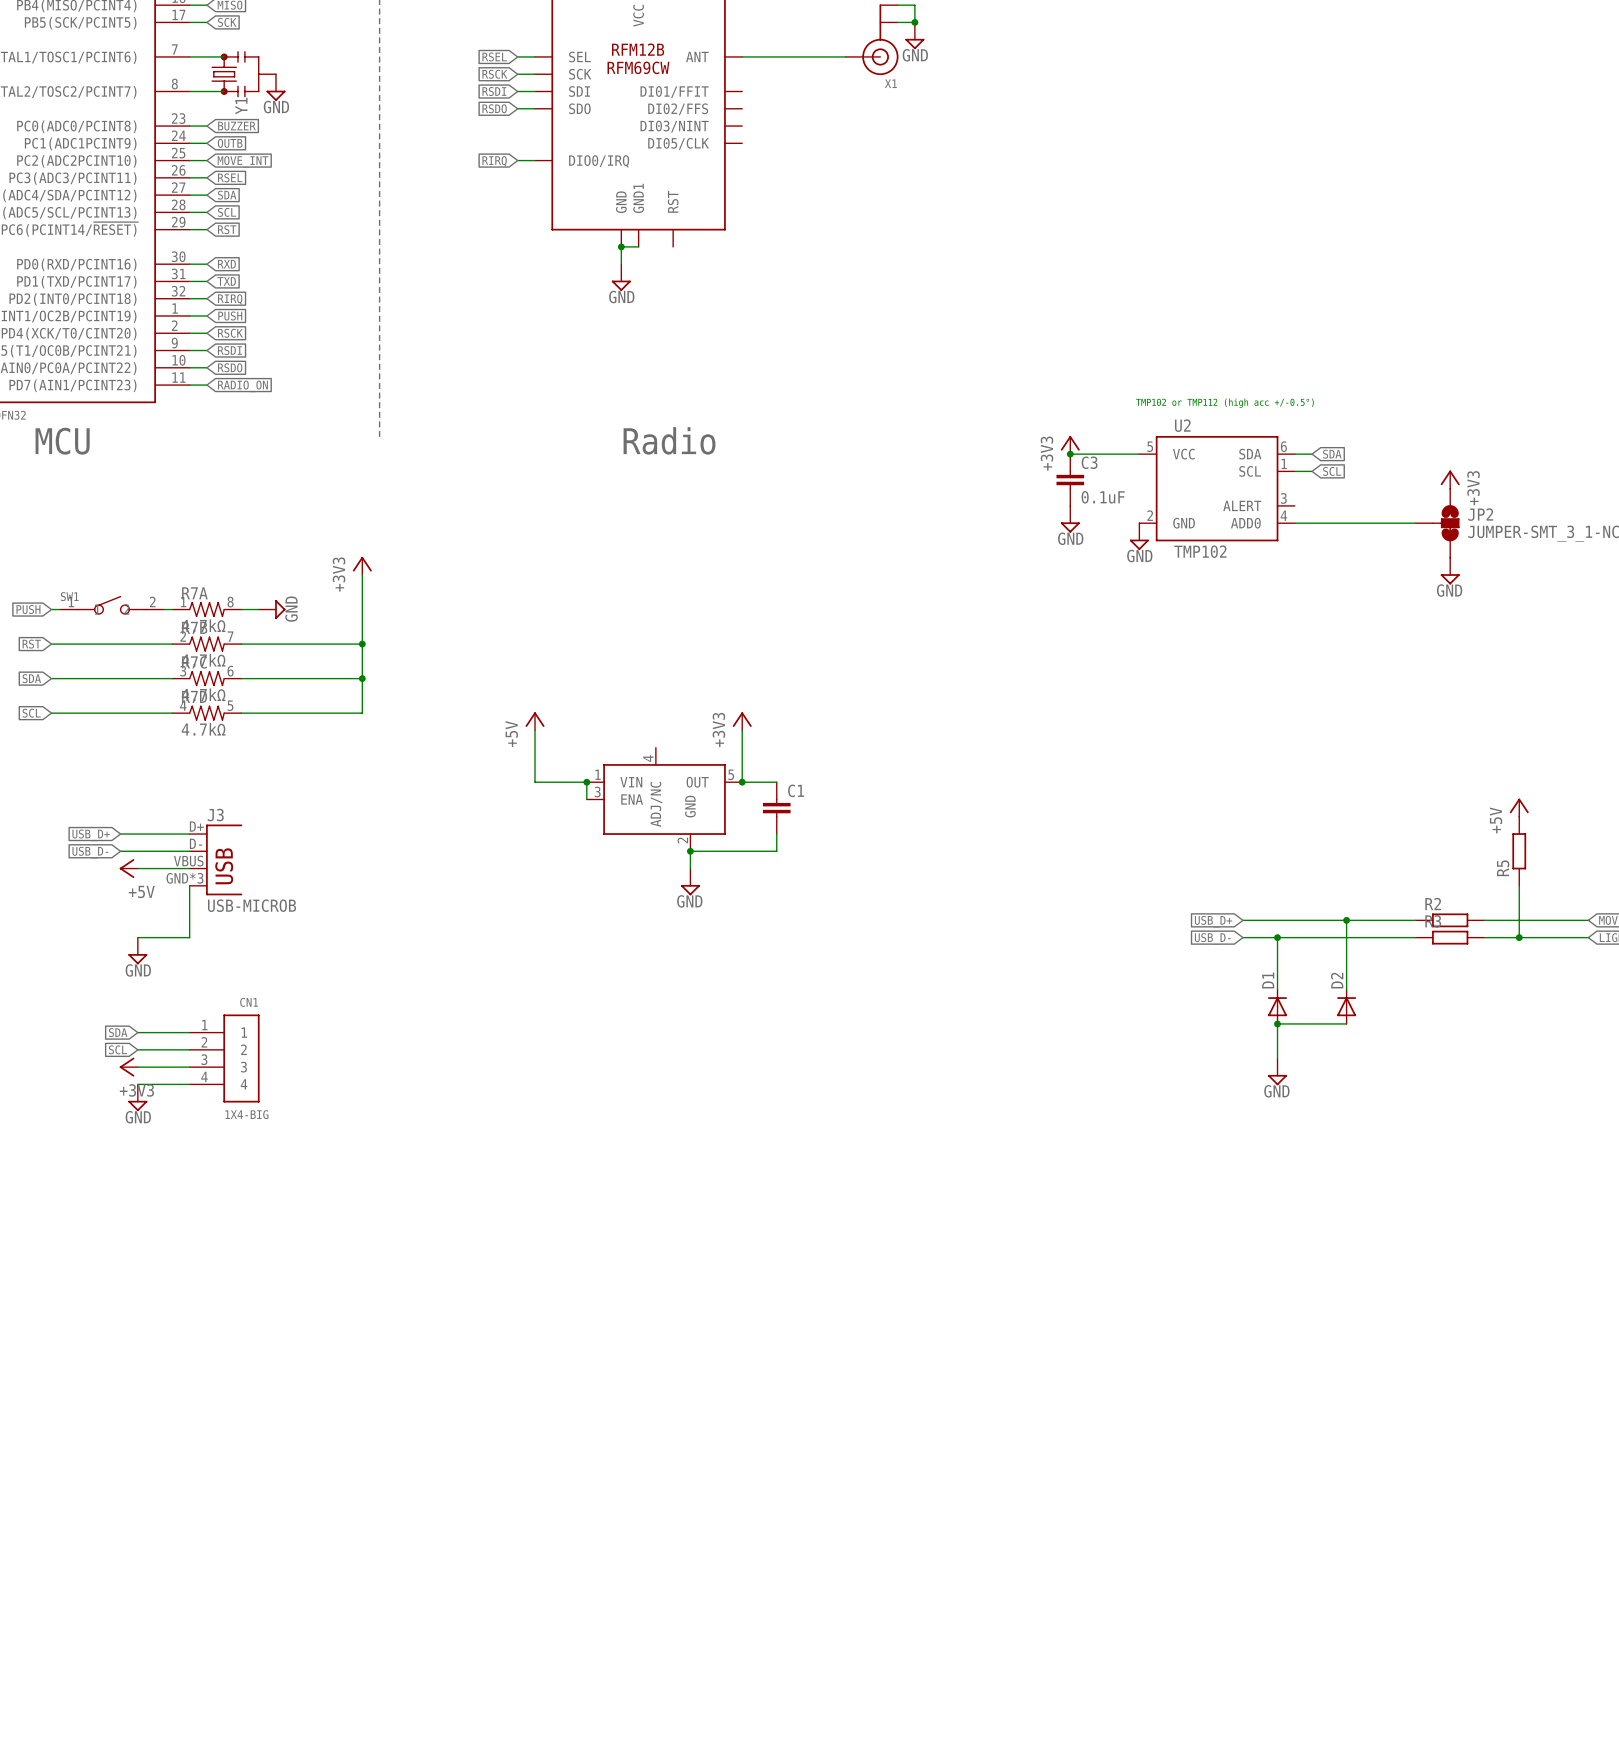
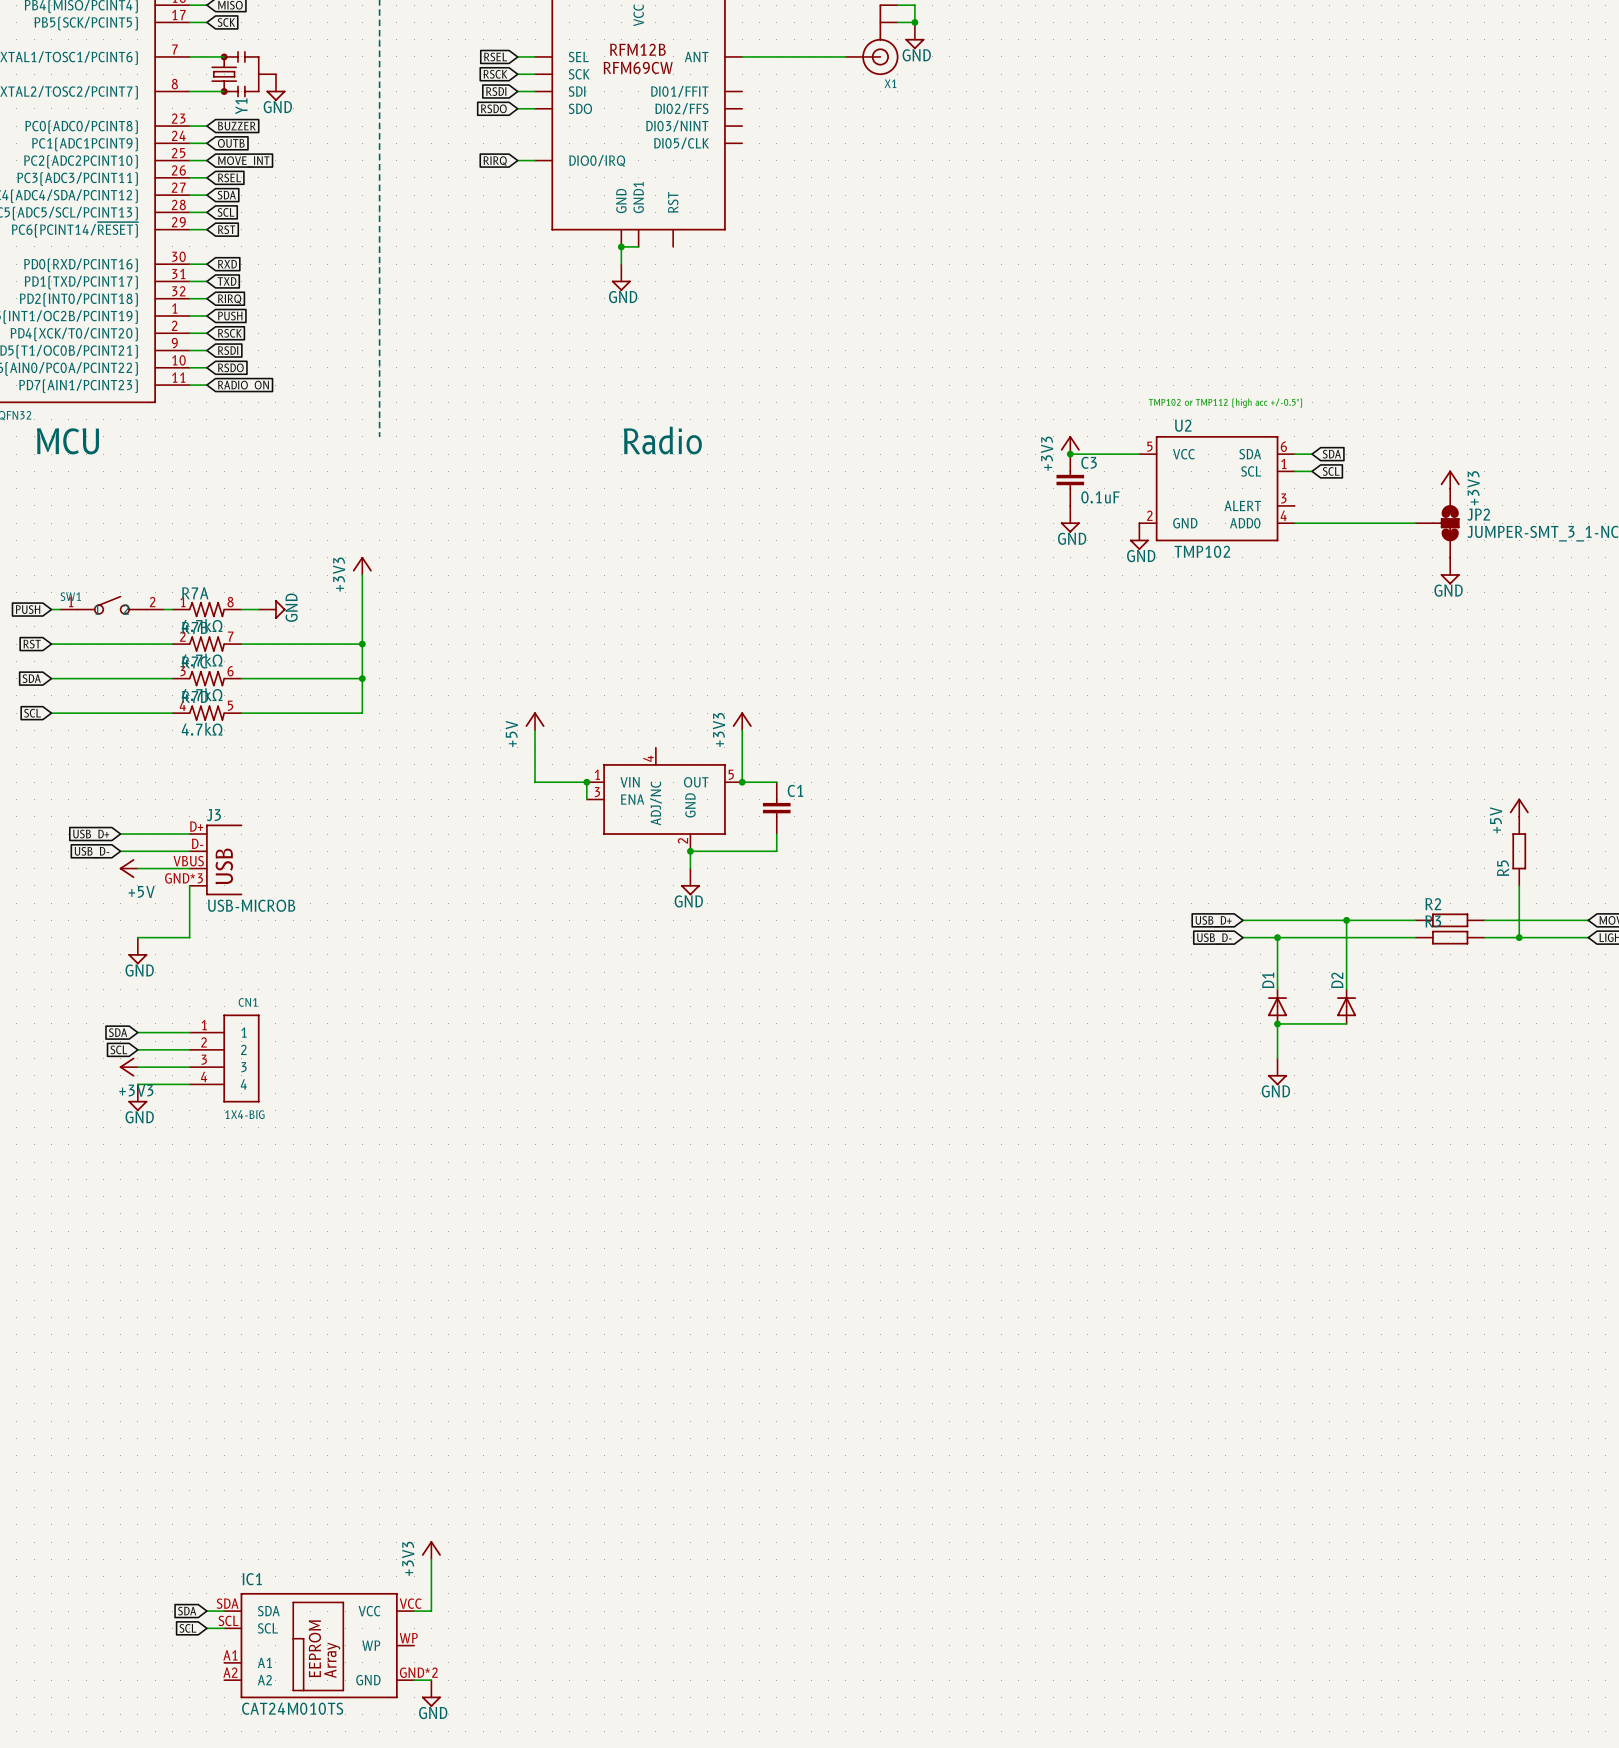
power symbol: none -> +3V3 (431, 1550)
wire: none -> (431, 1559) (431, 1611) (414, 1611)
global label: none -> SDA (187, 1611)
wire: none -> (206, 1611) (224, 1611)
global label: none -> SCL (187, 1628)
wire: none -> (206, 1628) (224, 1628)
IC1: none -> CAT24M010TS (319, 1645)
wire: none -> (414, 1680) (431, 1680)
power symbol: none -> GND (431, 1693)

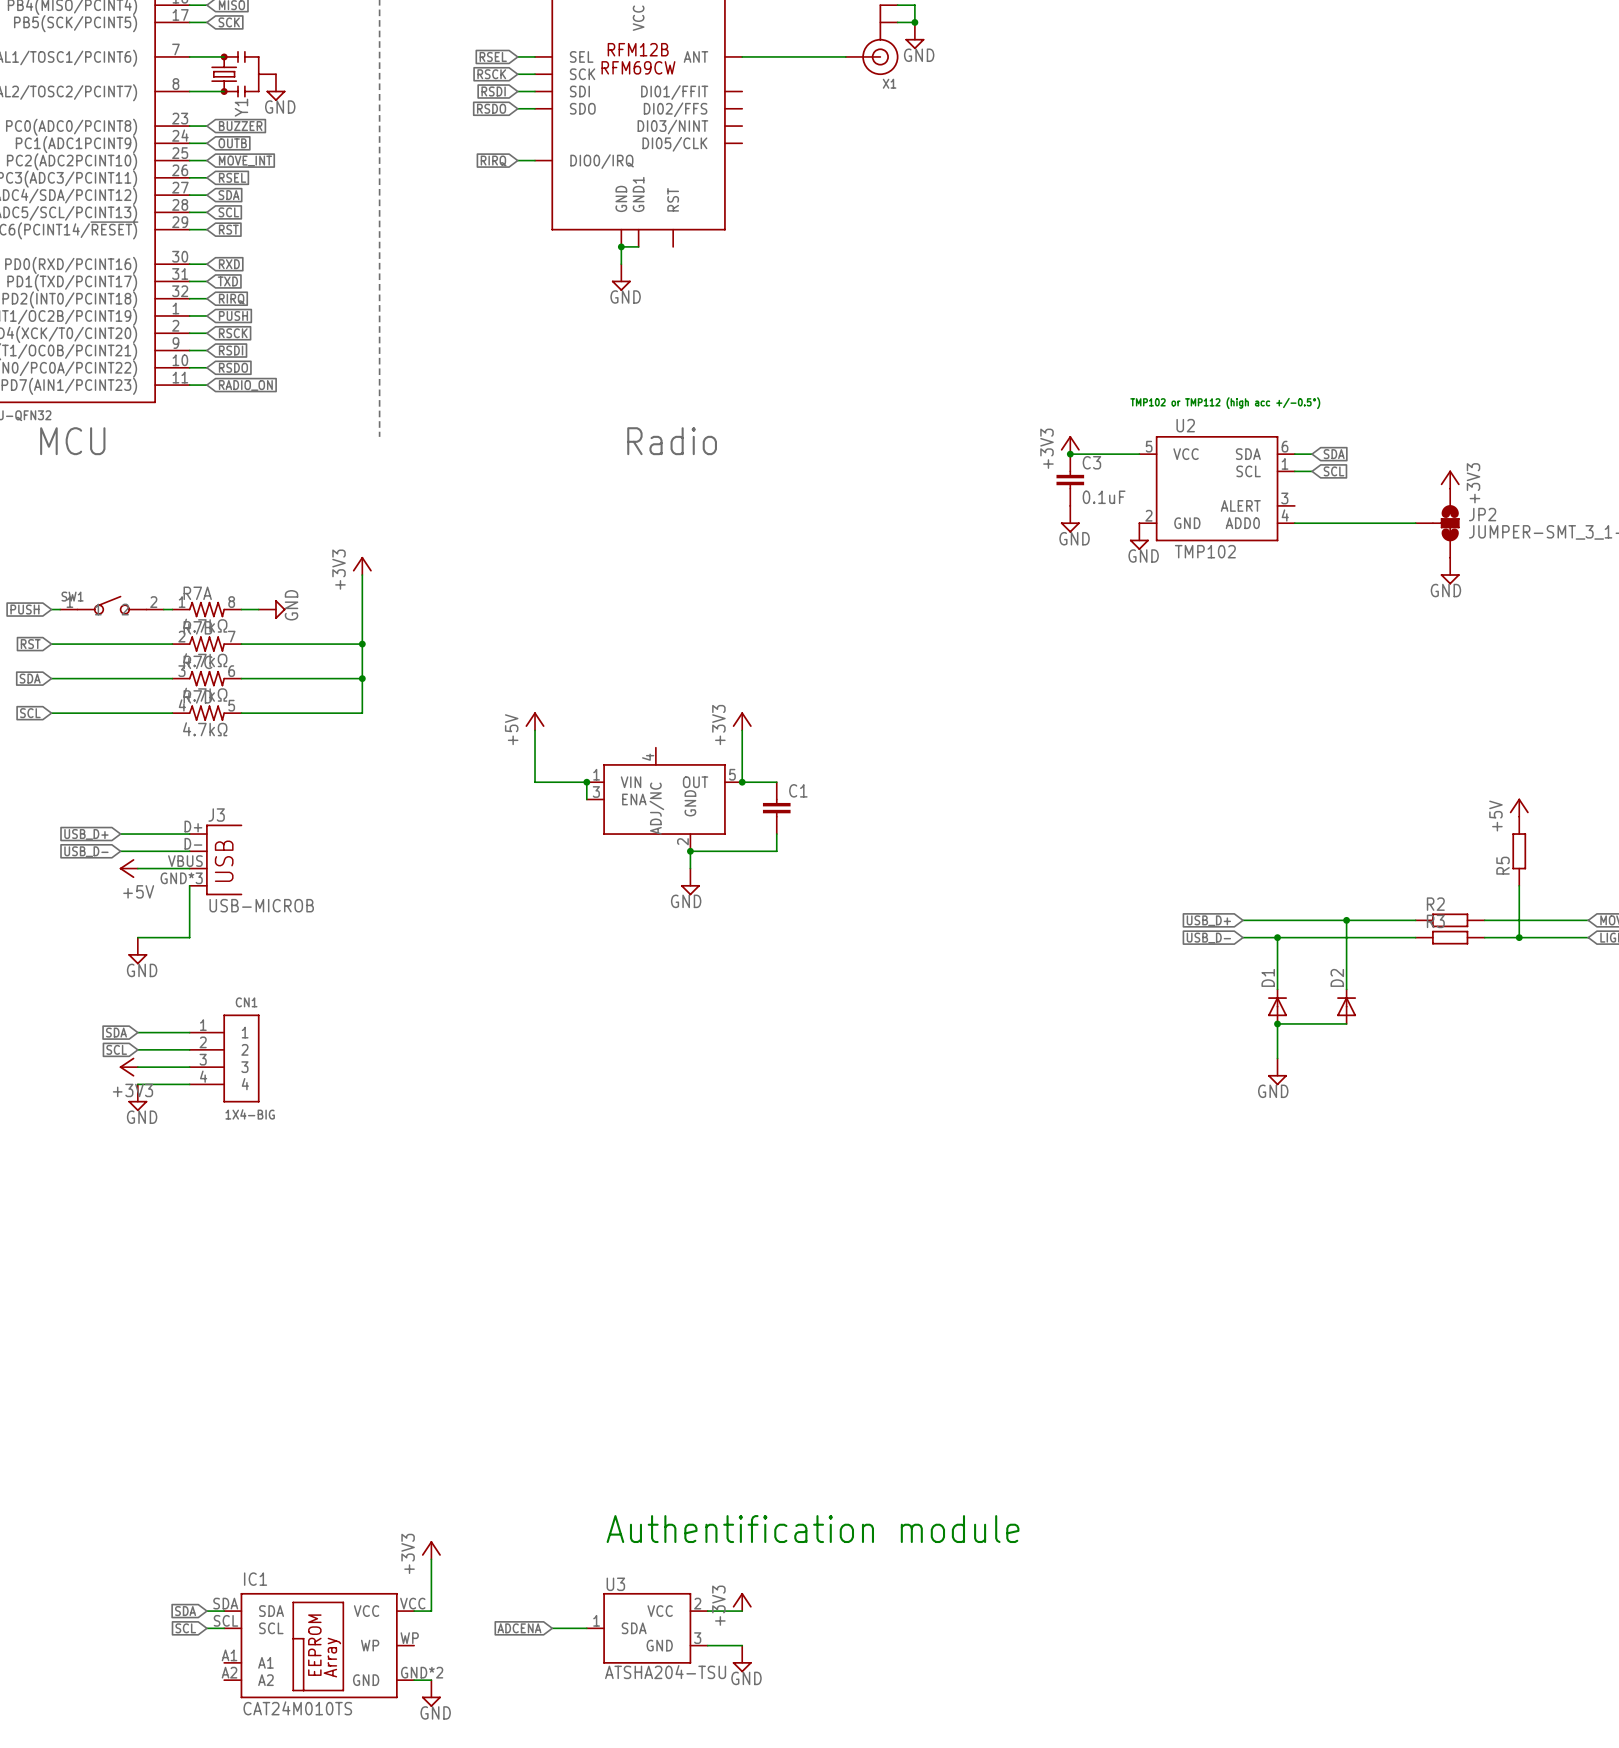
text: none -> Authentification module (813, 1529)
power symbol: none -> +3V3 (742, 1602)
wire: none -> (707, 1611) (742, 1611)
global label: none -> ADCENA (519, 1628)
wire: none -> (552, 1628) (586, 1628)
U3: none -> ATSHA204-TSU (647, 1628)
wire: none -> (707, 1645) (742, 1645)
power symbol: none -> GND (742, 1658)

